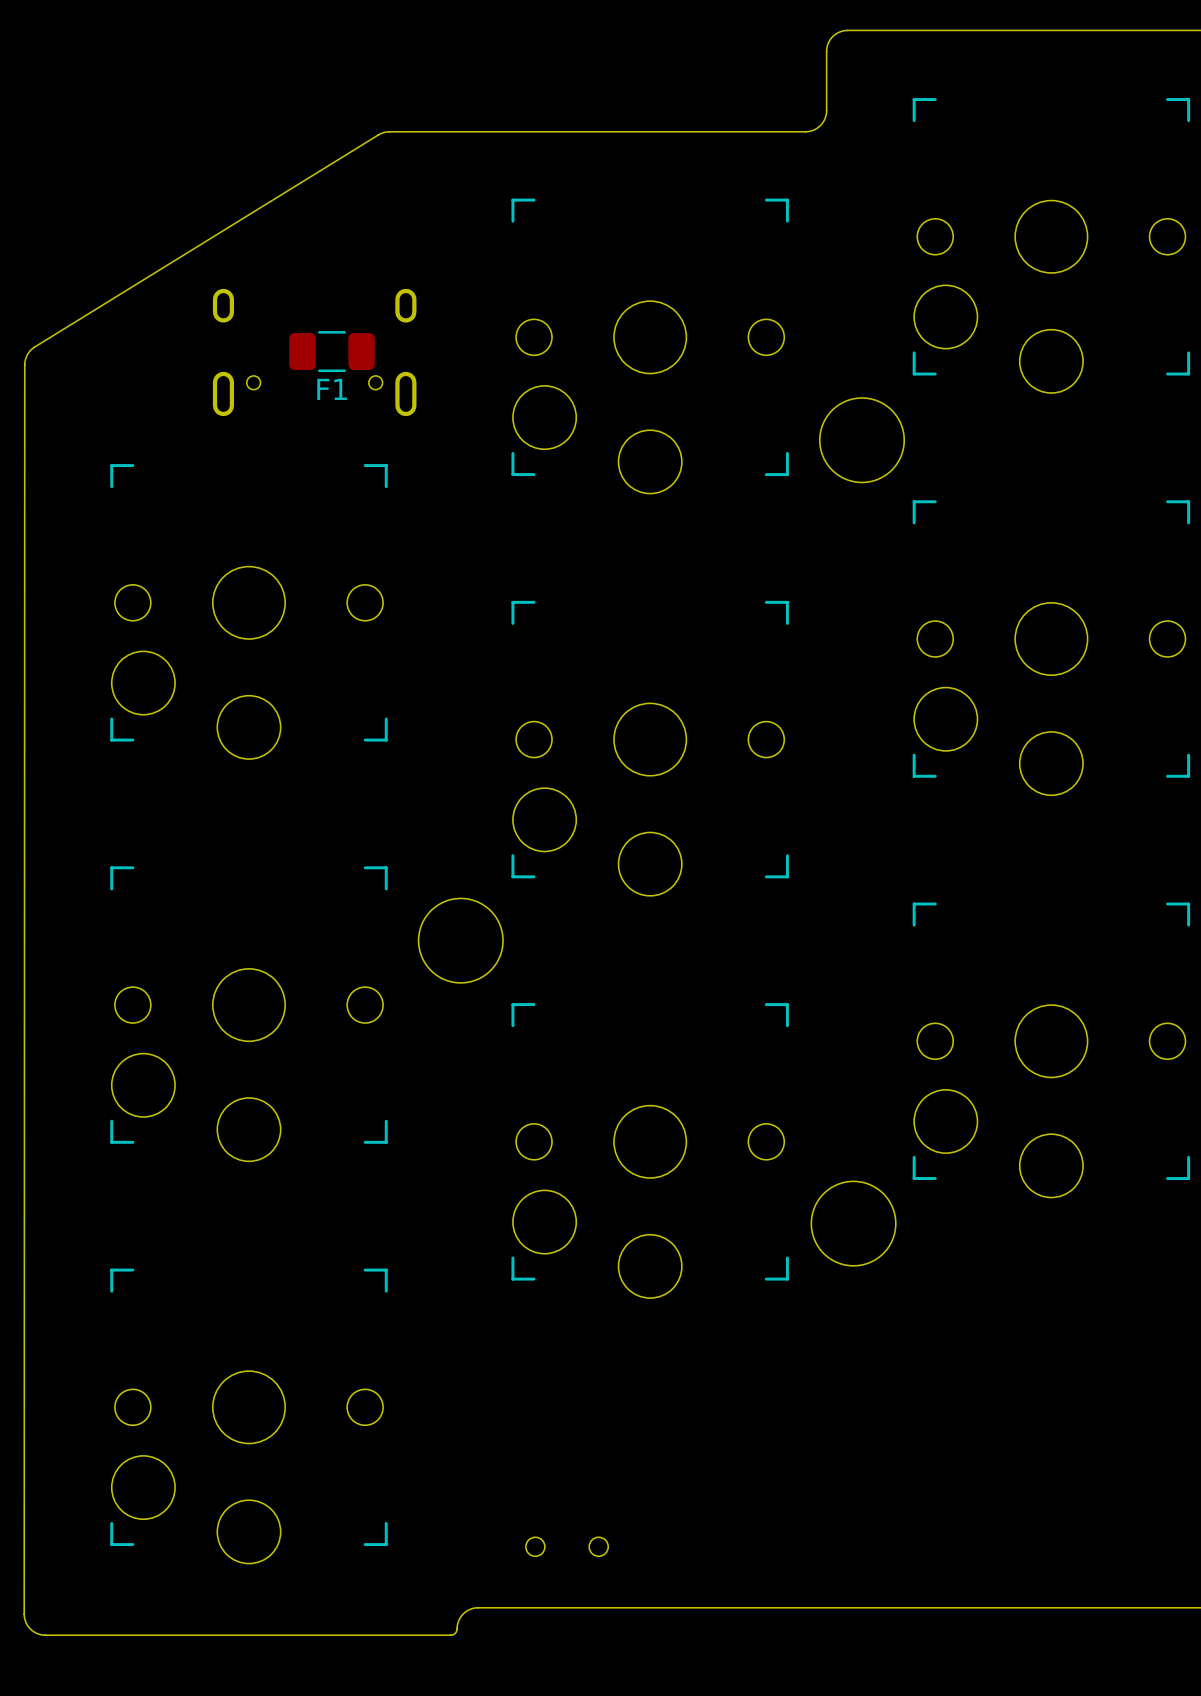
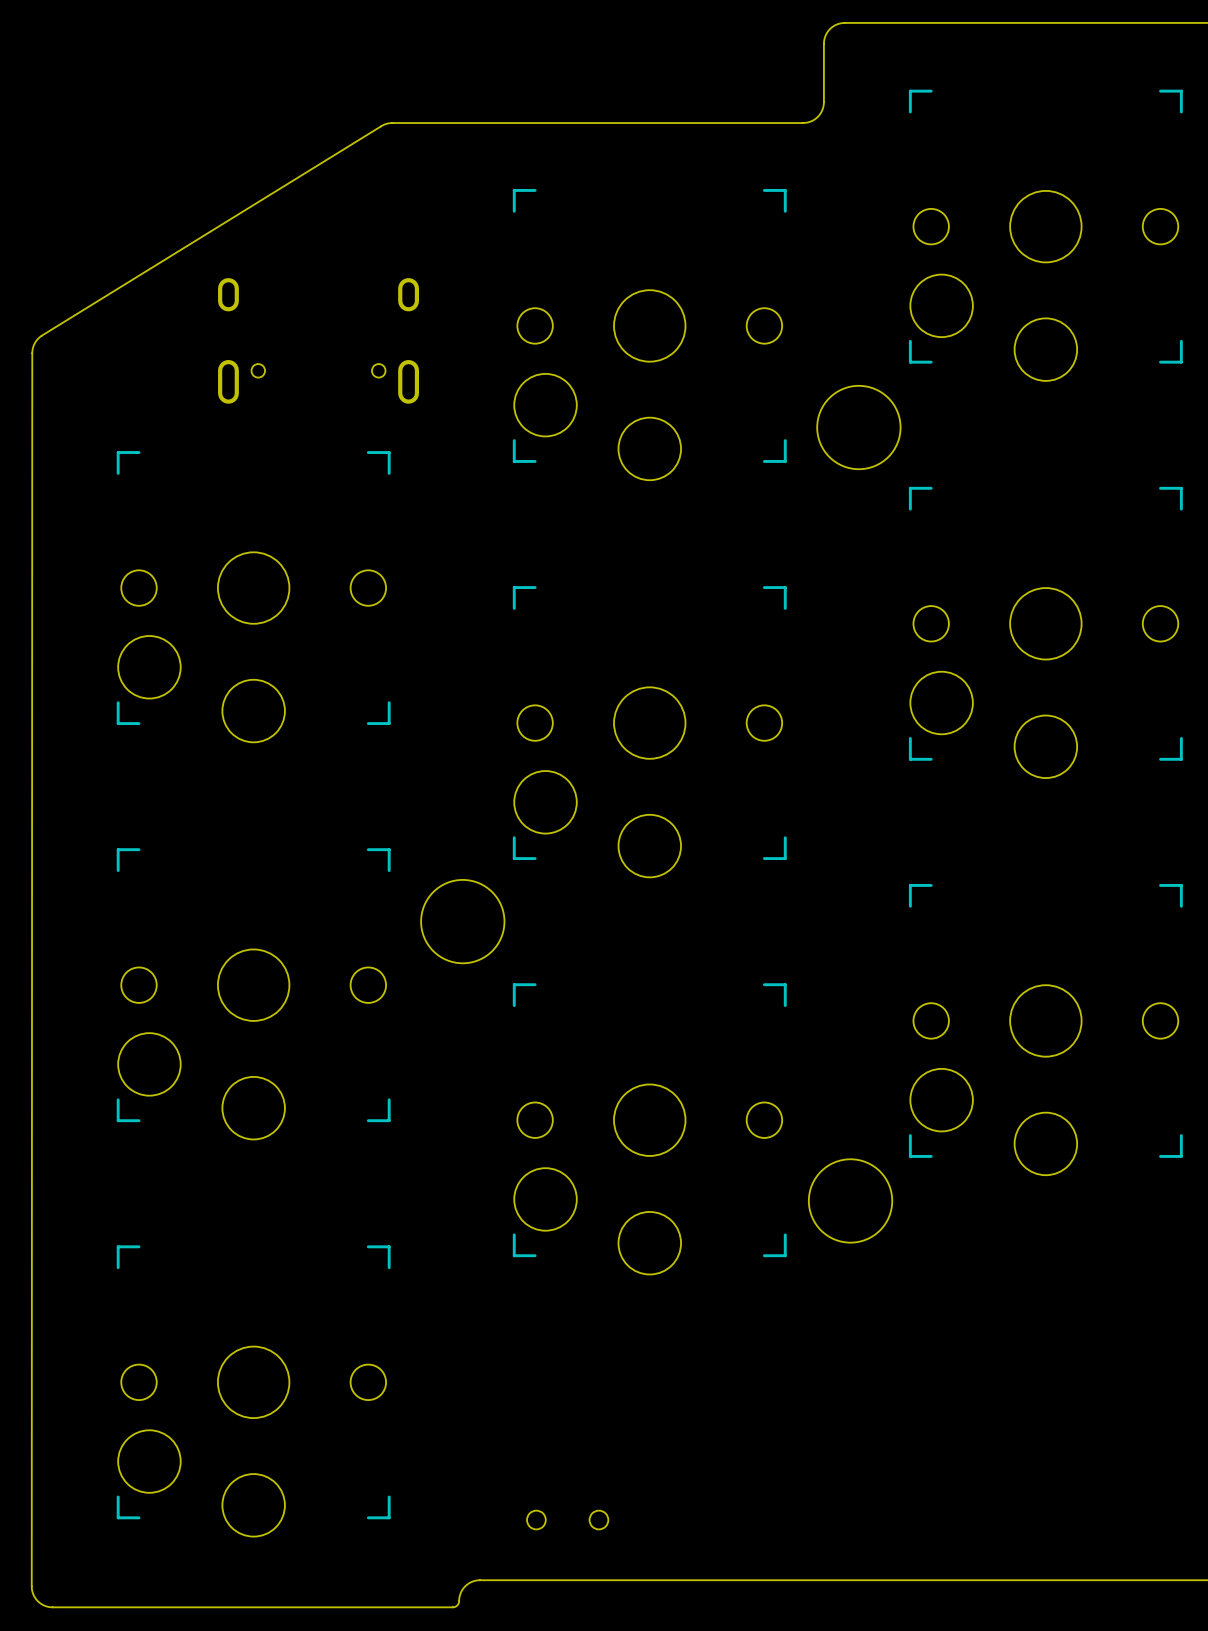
F1: (331, 351) -> none

